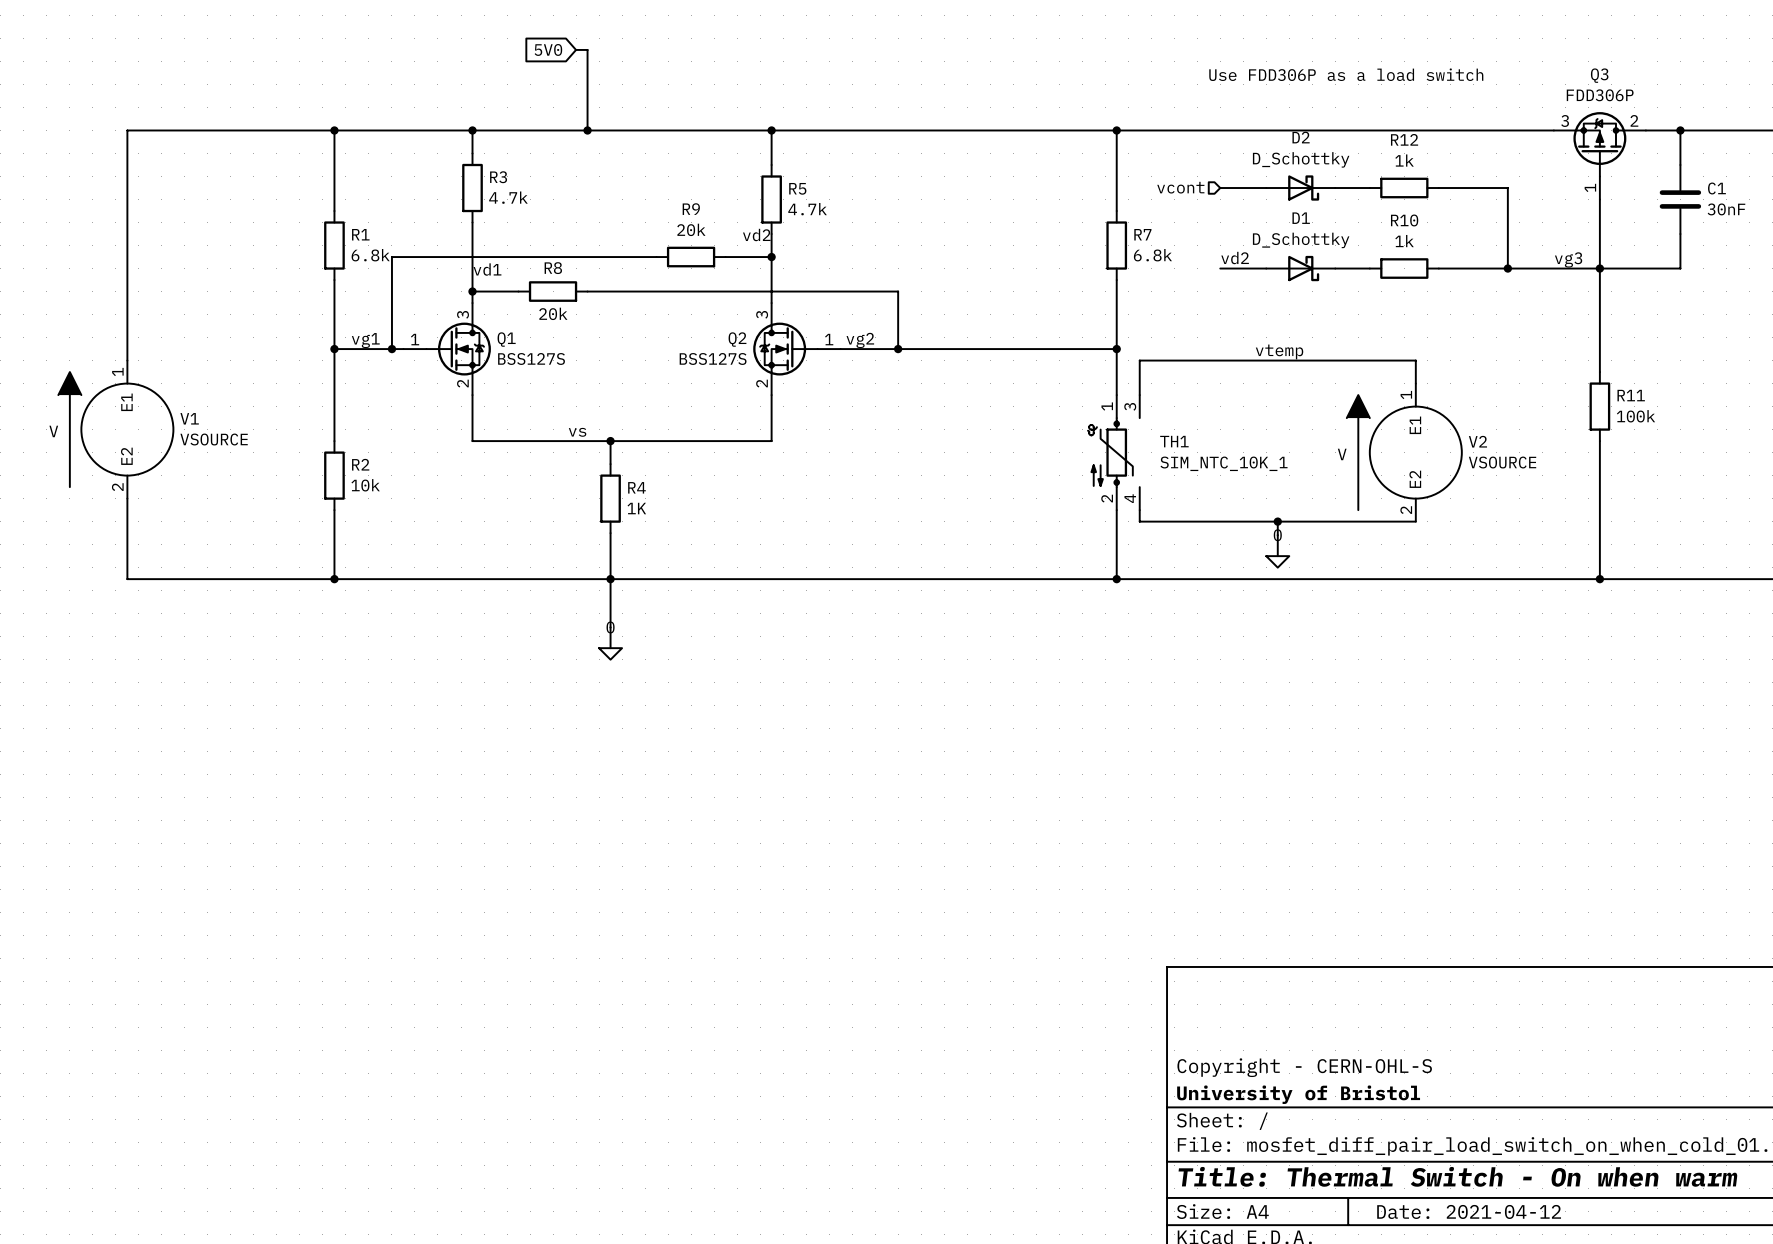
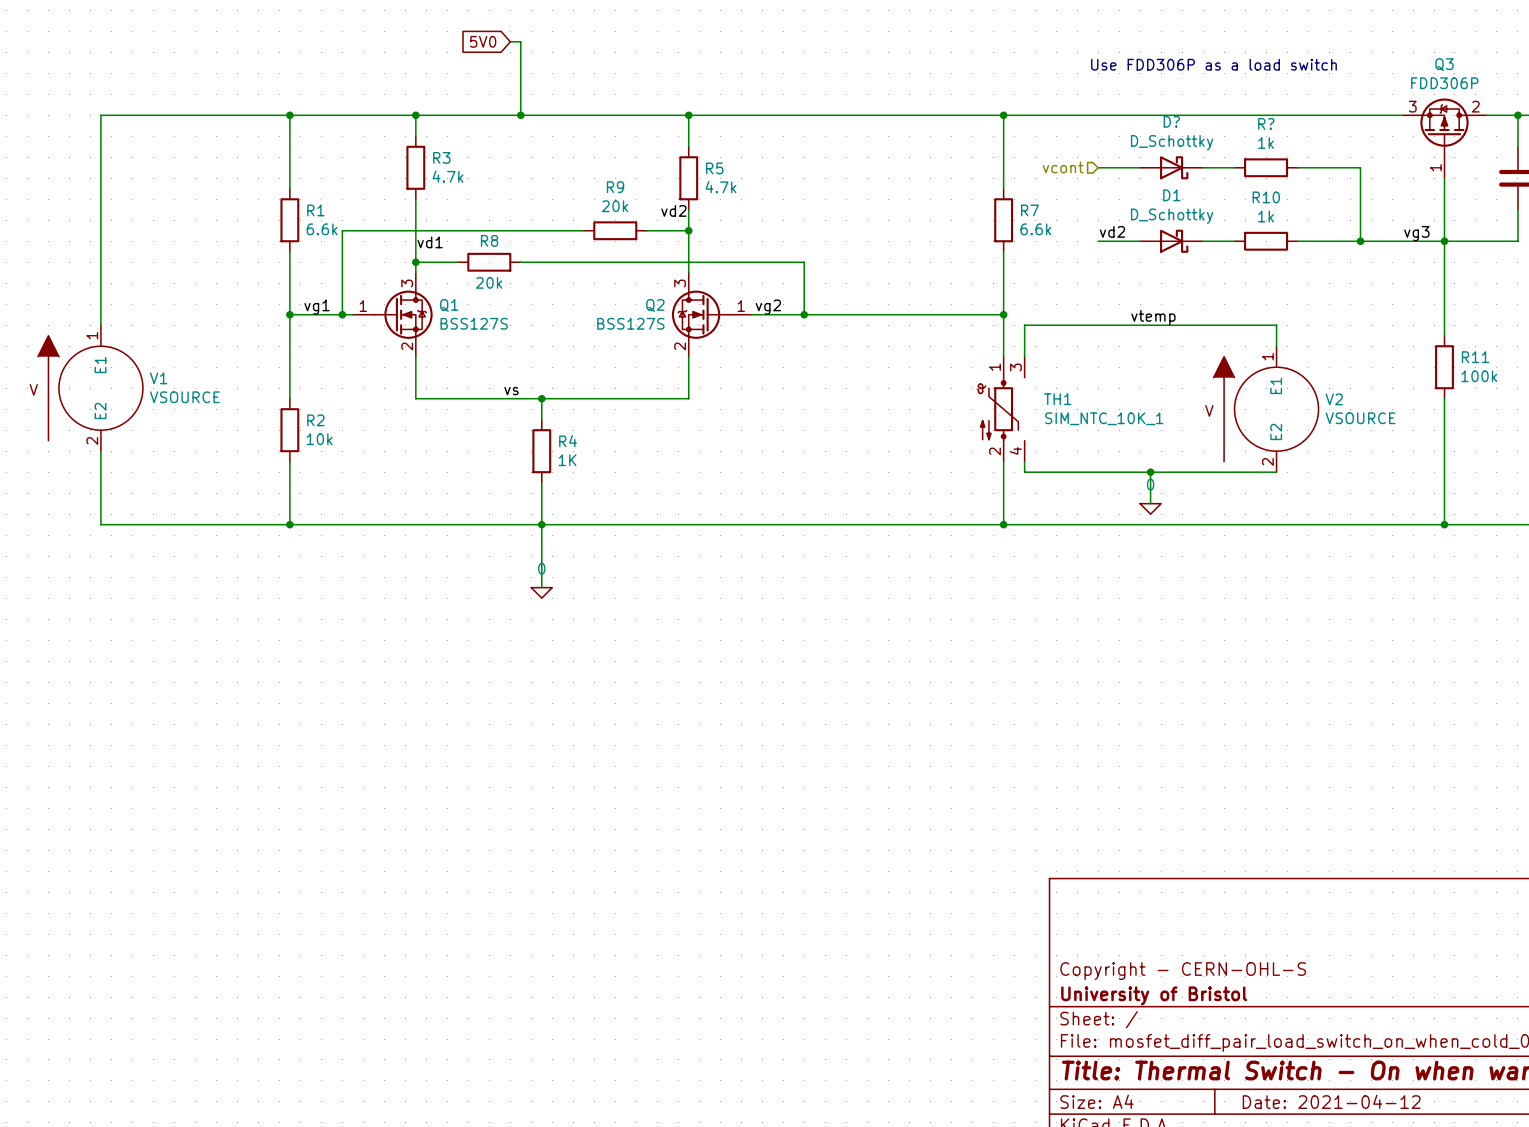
D2 name: D2 (1301, 137) -> D? (1171, 121)
R12 name: R12 (1404, 139) -> R? (1266, 123)
R1 value: 6.8k (370, 255) -> 6.6k (322, 229)
R7 value: 6.8k (1152, 255) -> 6.6k (1035, 229)

